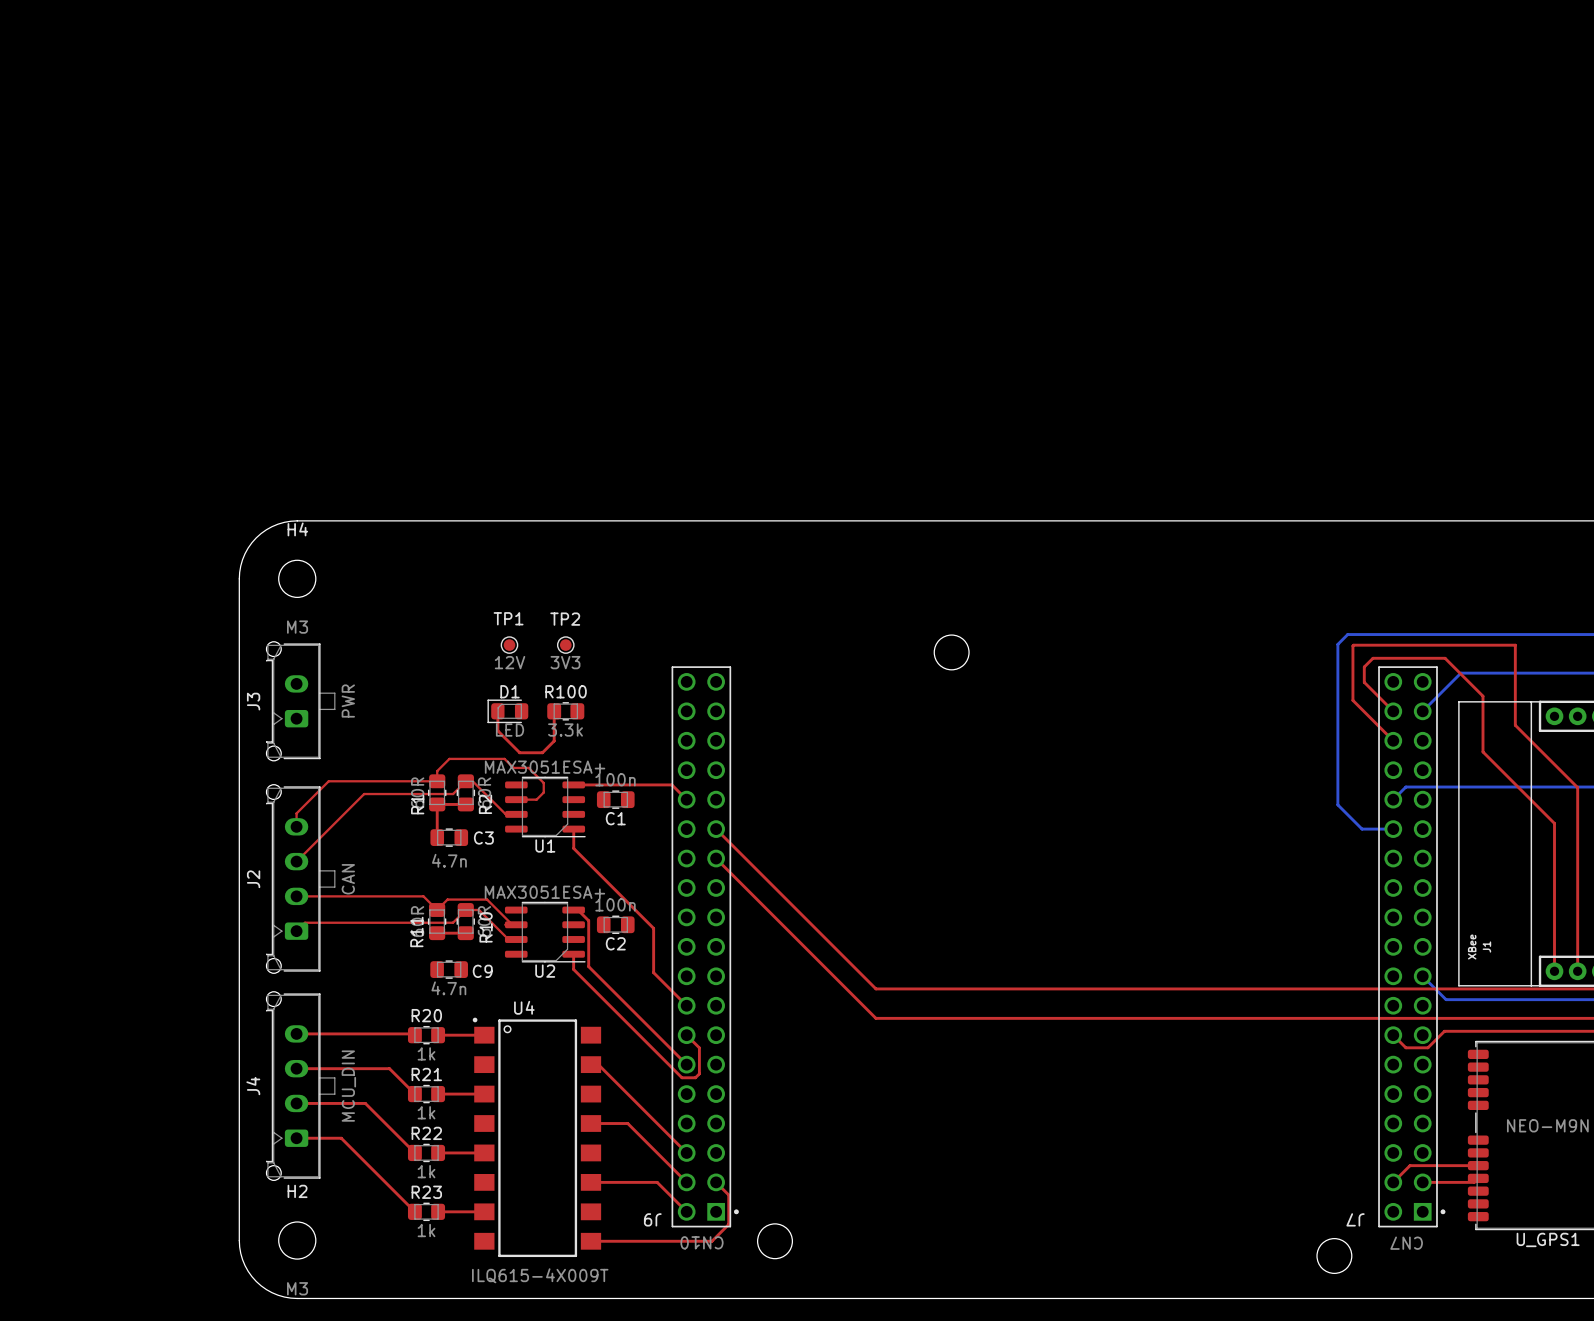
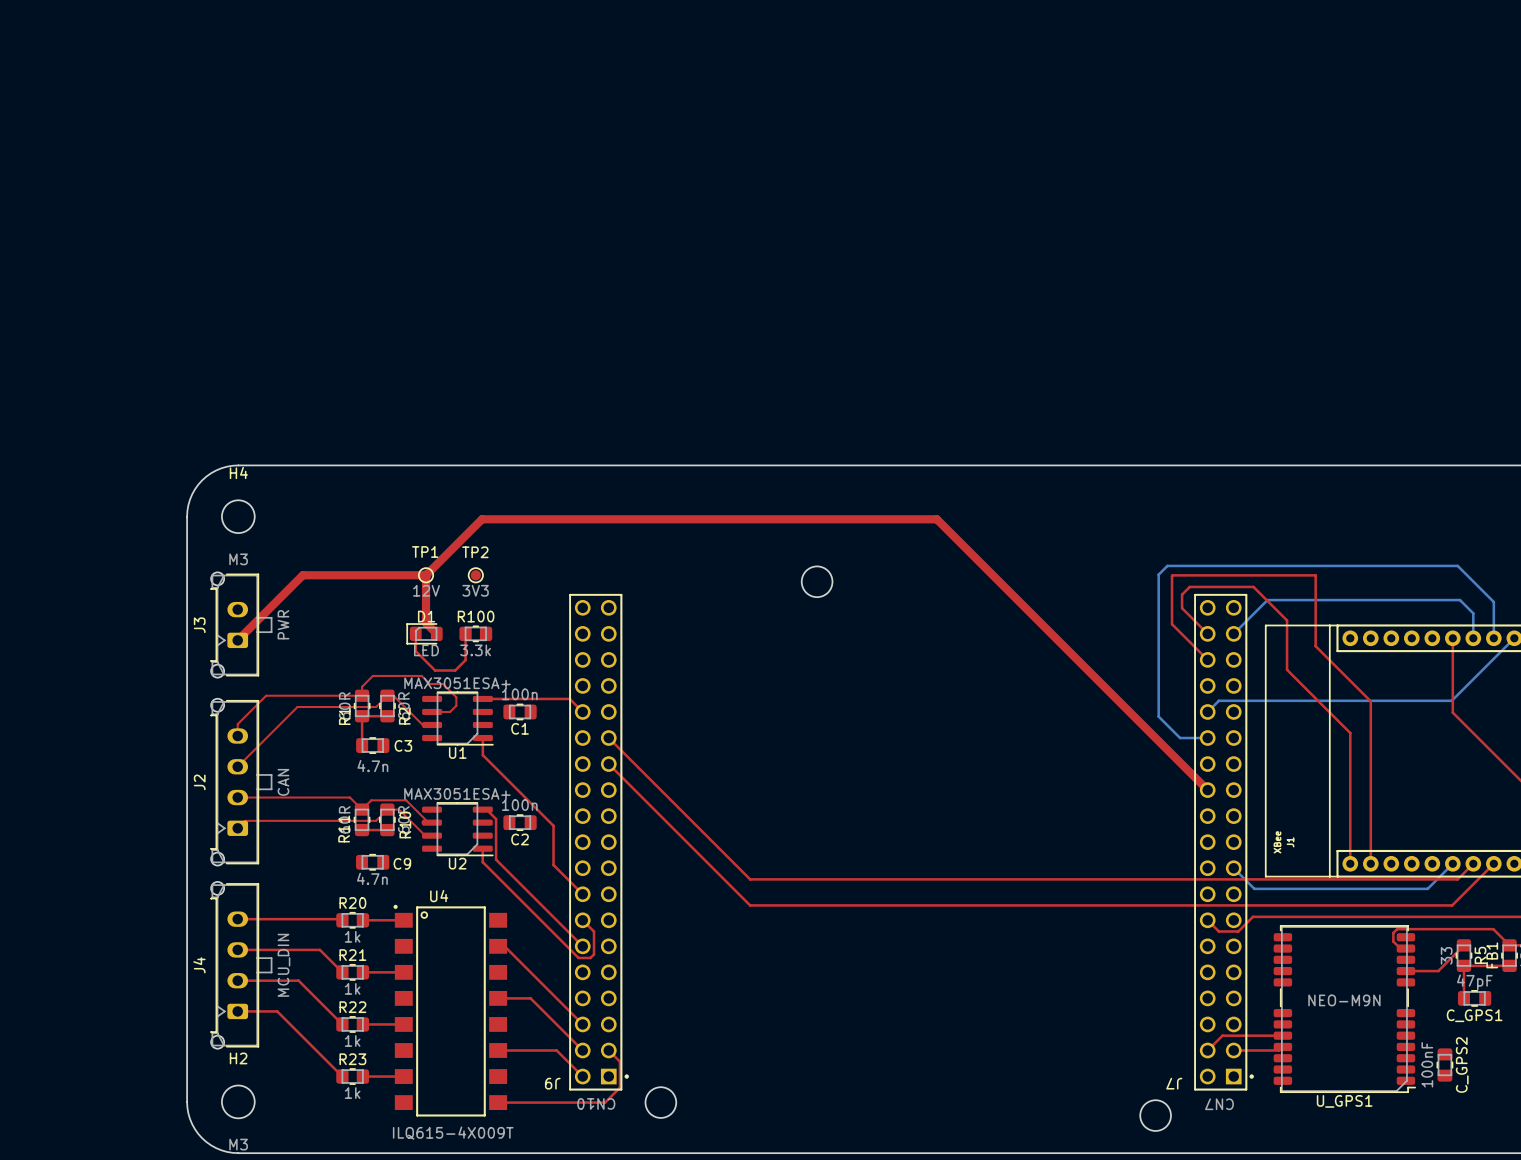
top track: none -> (426, 575) (302, 575) (237, 640)
top track: none -> (426, 575) (482, 519) (936, 519) (1207, 790)
top track: none -> (426, 575) (426, 623) (436, 633)

